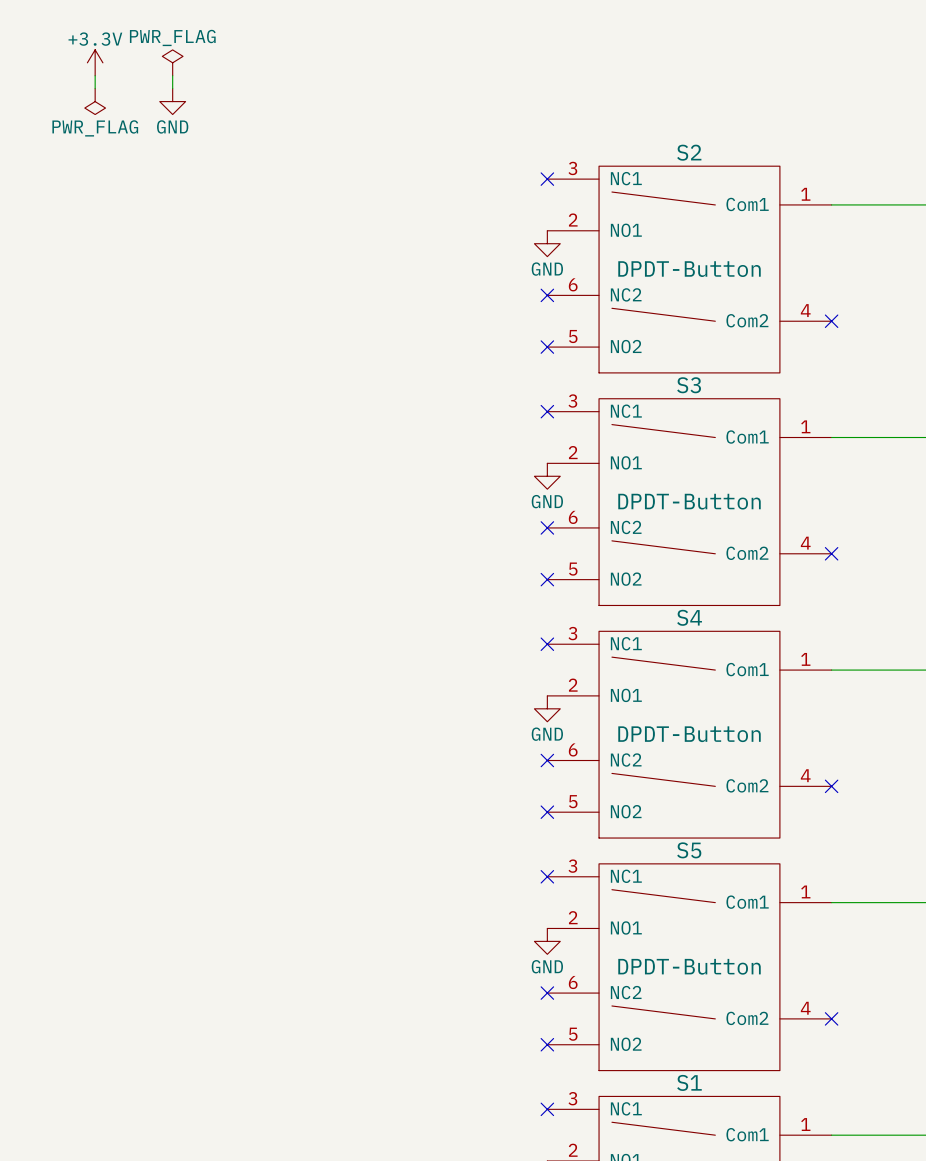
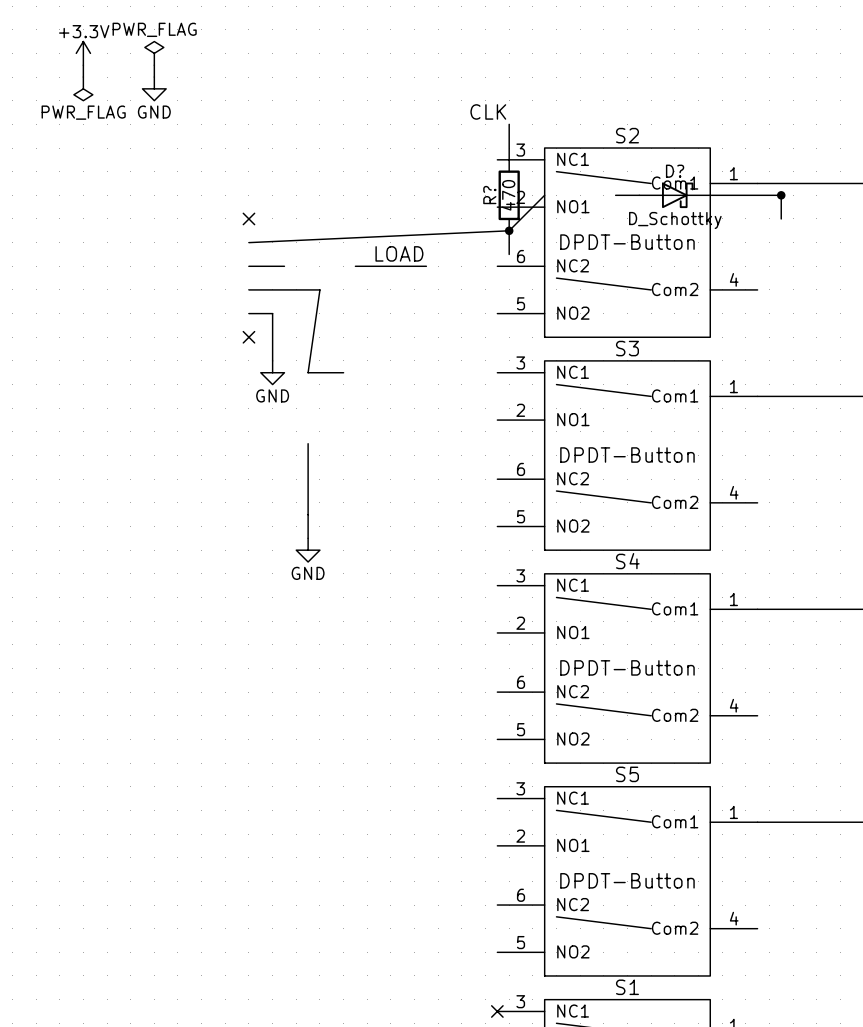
label: none -> CLK (488, 111)
wire: none -> (509, 124) (509, 159)
no-connect mark: (547, 179) -> none
R?: none -> 470 (509, 195)
wire: none -> (544, 195) (509, 230)
wire: none -> (615, 195) (639, 195)
D?: none -> D_Schottky (674, 195)
wire: none -> (710, 195) (781, 195) (781, 218)
junction: none -> (781, 195)
no-connect mark: none -> (248, 218)
power symbol: GND (547, 243) -> none
wire: none -> (509, 230) (248, 242)
wire: none -> (509, 230) (509, 254)
junction: none -> (509, 230)
label: none -> LOAD (399, 253)
wire: none -> (248, 266) (284, 266)
wire: none -> (355, 266) (426, 266)
no-connect mark: (547, 295) -> none
wire: none -> (248, 289) (319, 289) (308, 372) (343, 372)
no-connect mark: (831, 321) -> none
wire: none -> (248, 313) (272, 313) (272, 360)
no-connect mark: (547, 347) -> none
no-connect mark: none -> (248, 337)
power symbol: none -> GND (272, 372)
no-connect mark: (547, 411) -> none
power symbol: GND (547, 476) -> none
wire: none -> (308, 443) (308, 538)
no-connect mark: (547, 527) -> none
no-connect mark: (831, 553) -> none
no-connect mark: (547, 579) -> none
power symbol: none -> GND (308, 550)
no-connect mark: (547, 644) -> none
power symbol: GND (547, 708) -> none
no-connect mark: (547, 760) -> none
no-connect mark: (831, 786) -> none
no-connect mark: (547, 812) -> none
no-connect mark: (547, 876) -> none
power symbol: GND (547, 941) -> none
no-connect mark: (547, 993) -> none
no-connect mark: (831, 1018) -> none
no-connect mark: (547, 1044) -> none

